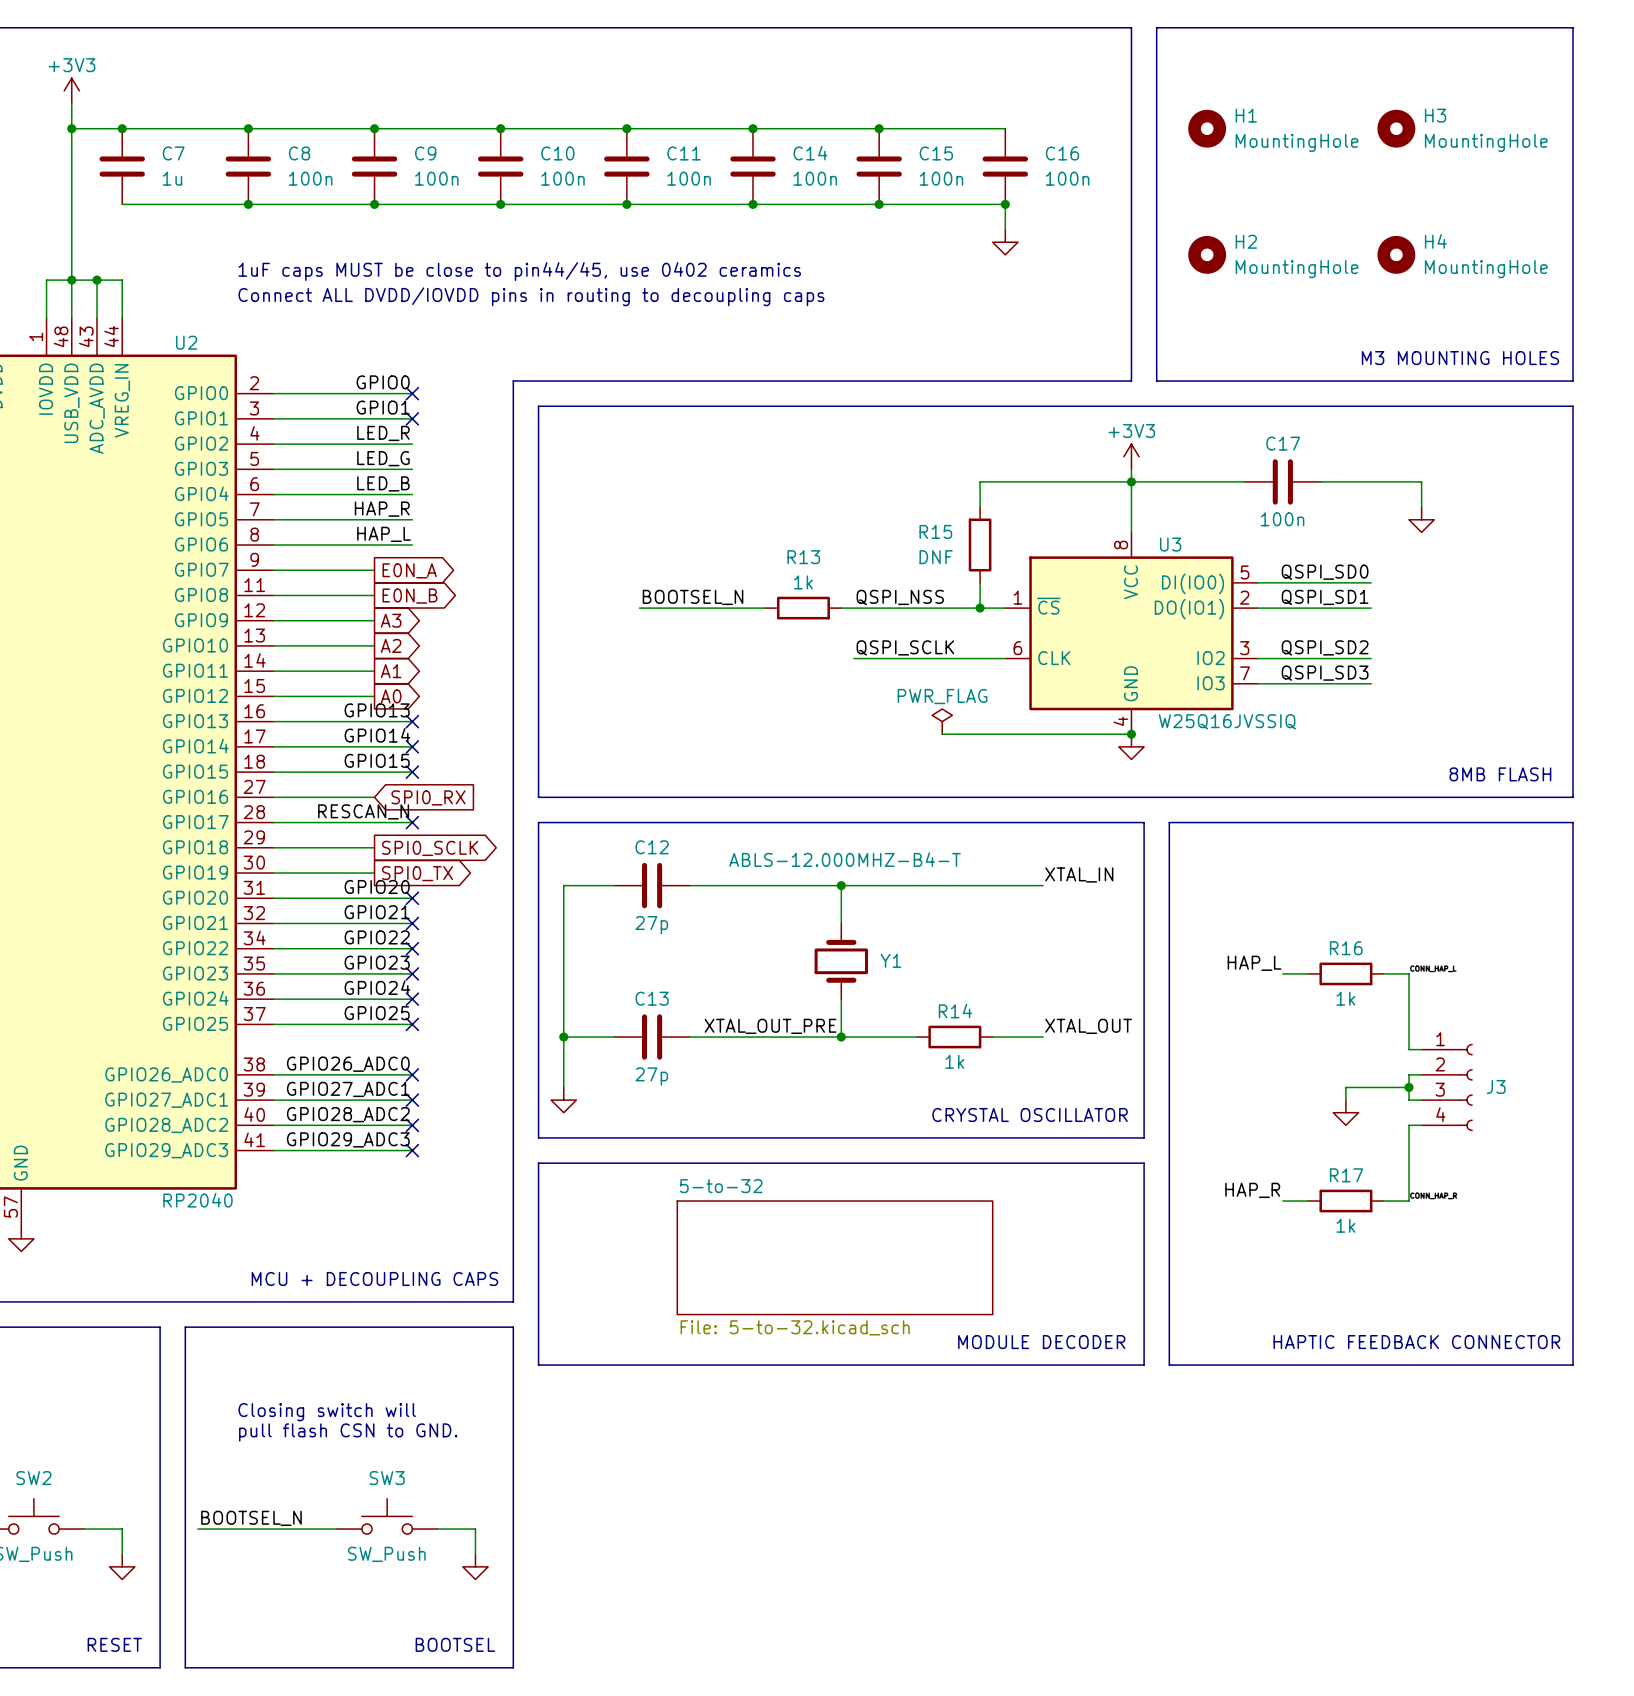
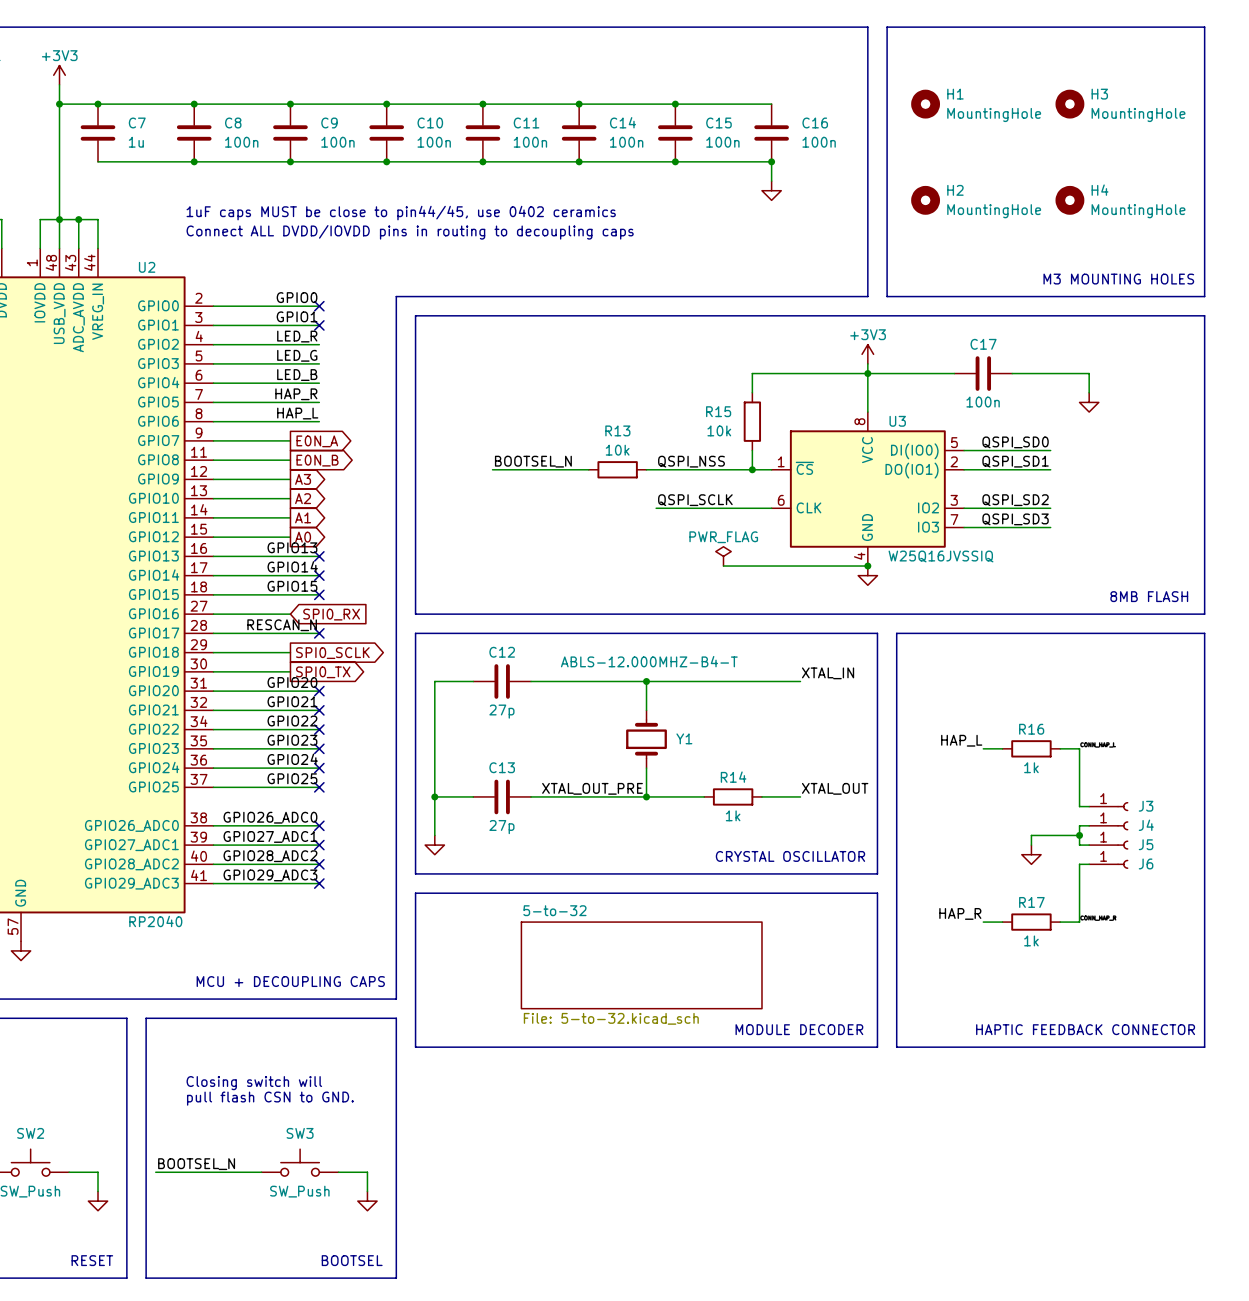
R15 value: DNF (936, 557) -> 10k (719, 430)
R13 value: 1k (803, 582) -> 10k (617, 450)
J3 symbol: [1421, 1043, 1473, 1132] -> [1089, 802, 1129, 812]
J4: none -> (1108, 825)
J5: none -> (1108, 845)
J6: none -> (1108, 864)

